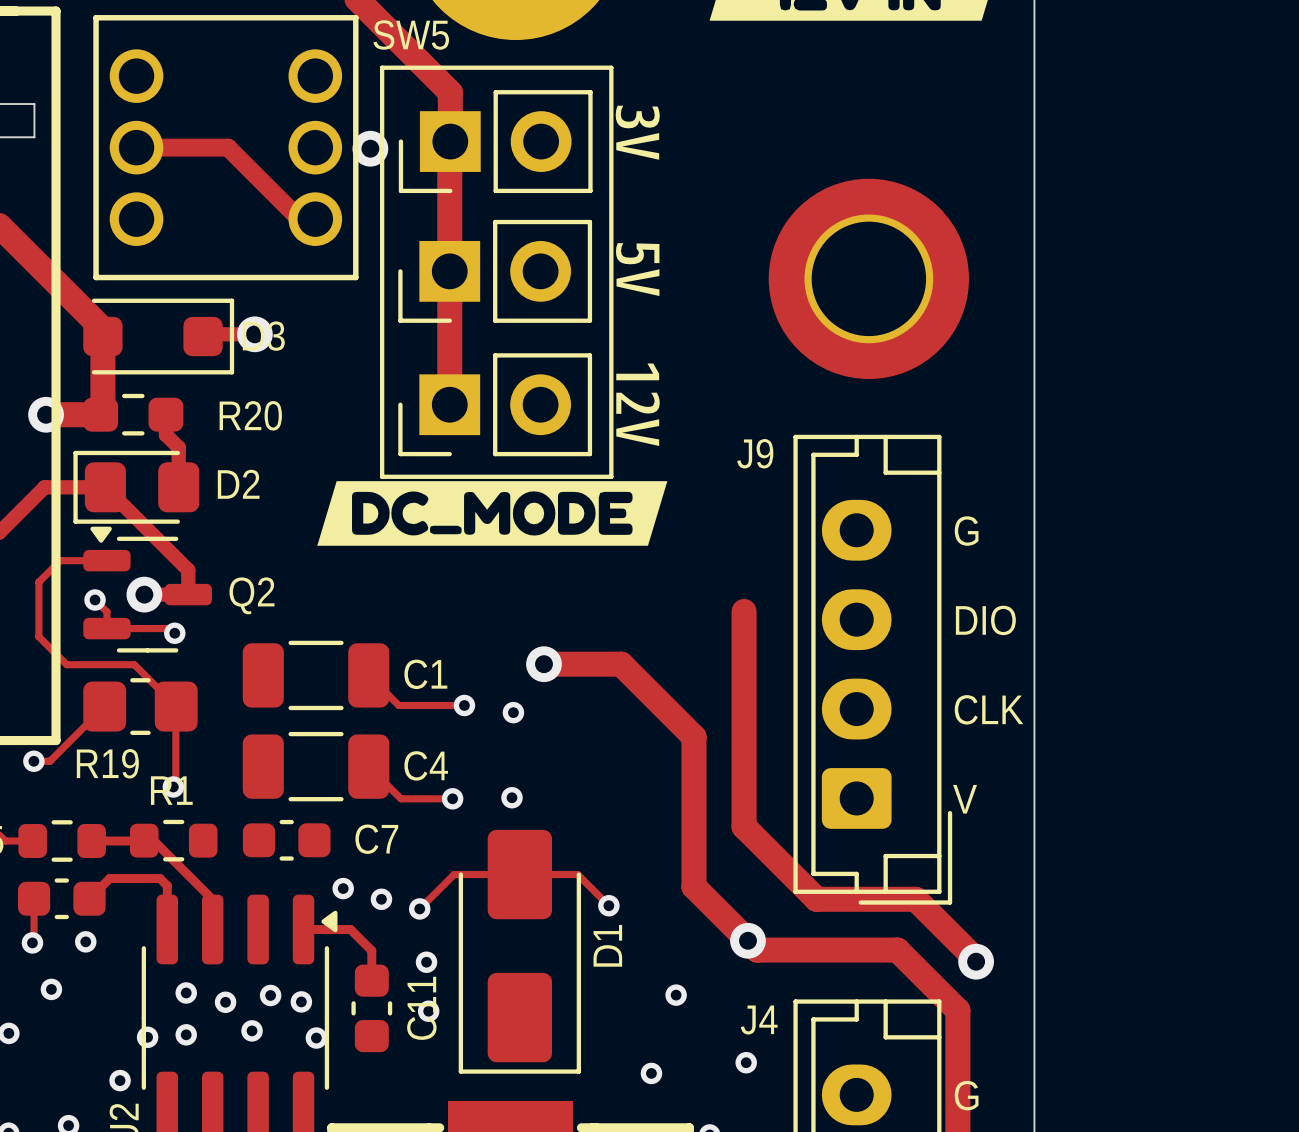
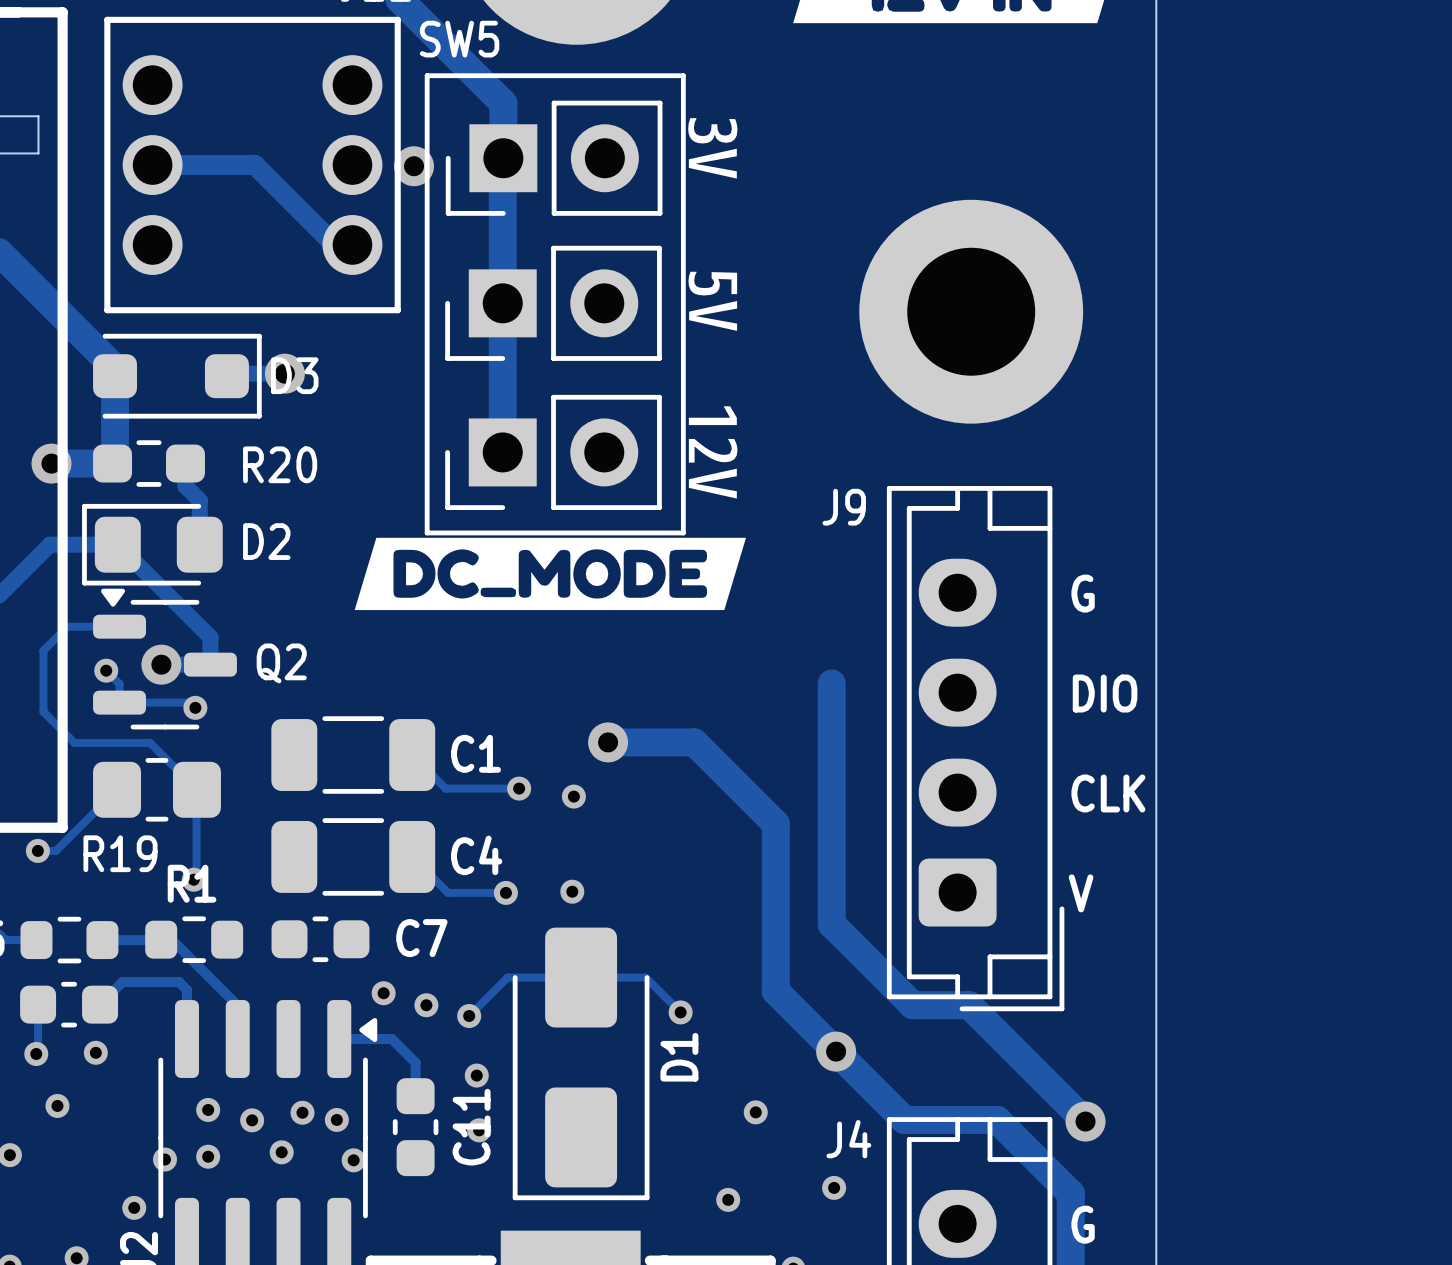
track: (867, 899) (915, 899) (976, 961) -> (969, 1005) (1085, 1121)
track: (757, 950) (897, 950) (957, 1010) (957, 1067) -> (846, 1061) (904, 1119) (997, 1119) (1070, 1193)
via position: (976, 961) -> (1085, 1121)

